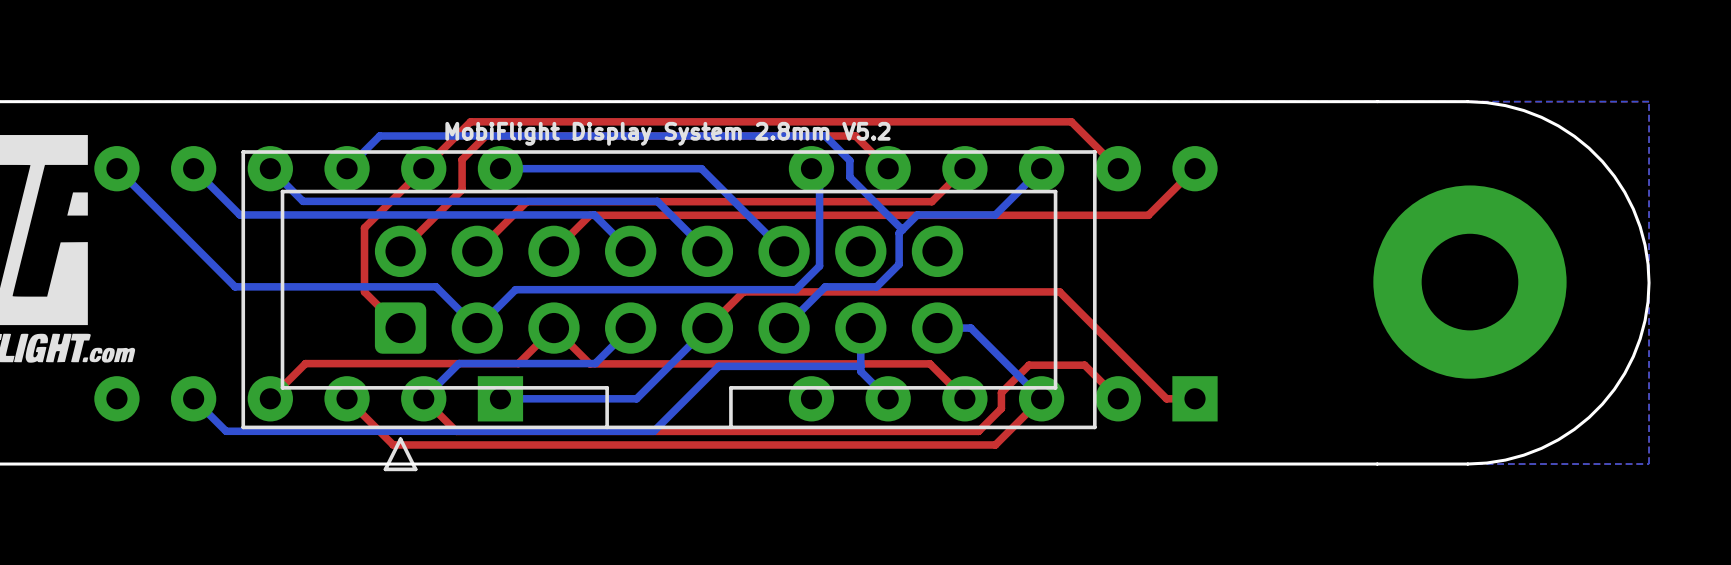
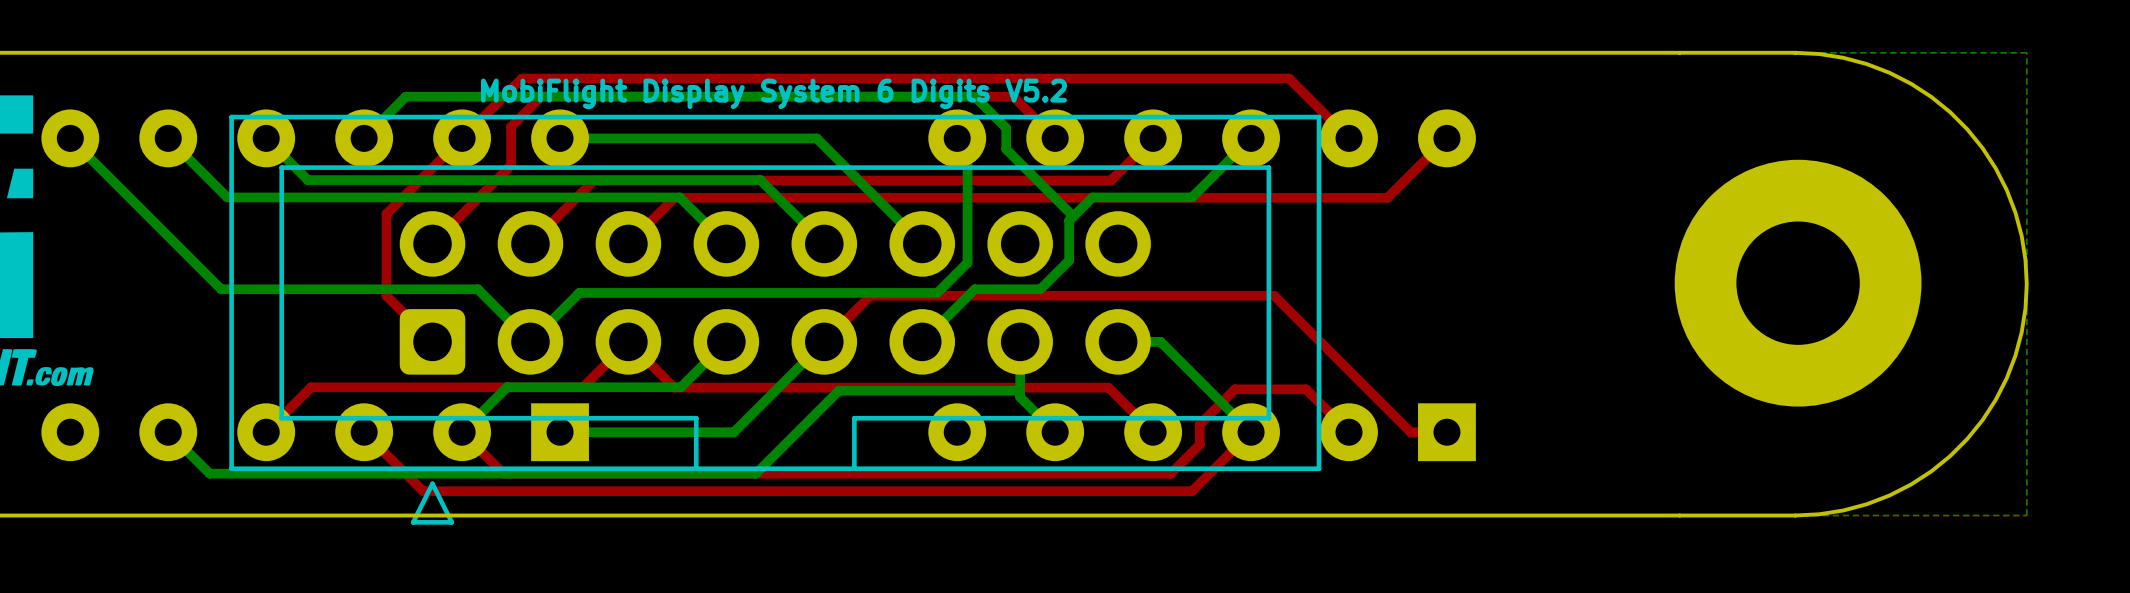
text: MobiFlight Display System 2.8mm V5.2 (667, 133) -> MobiFlight Display System 6 Digits V5.2 (773, 93)

